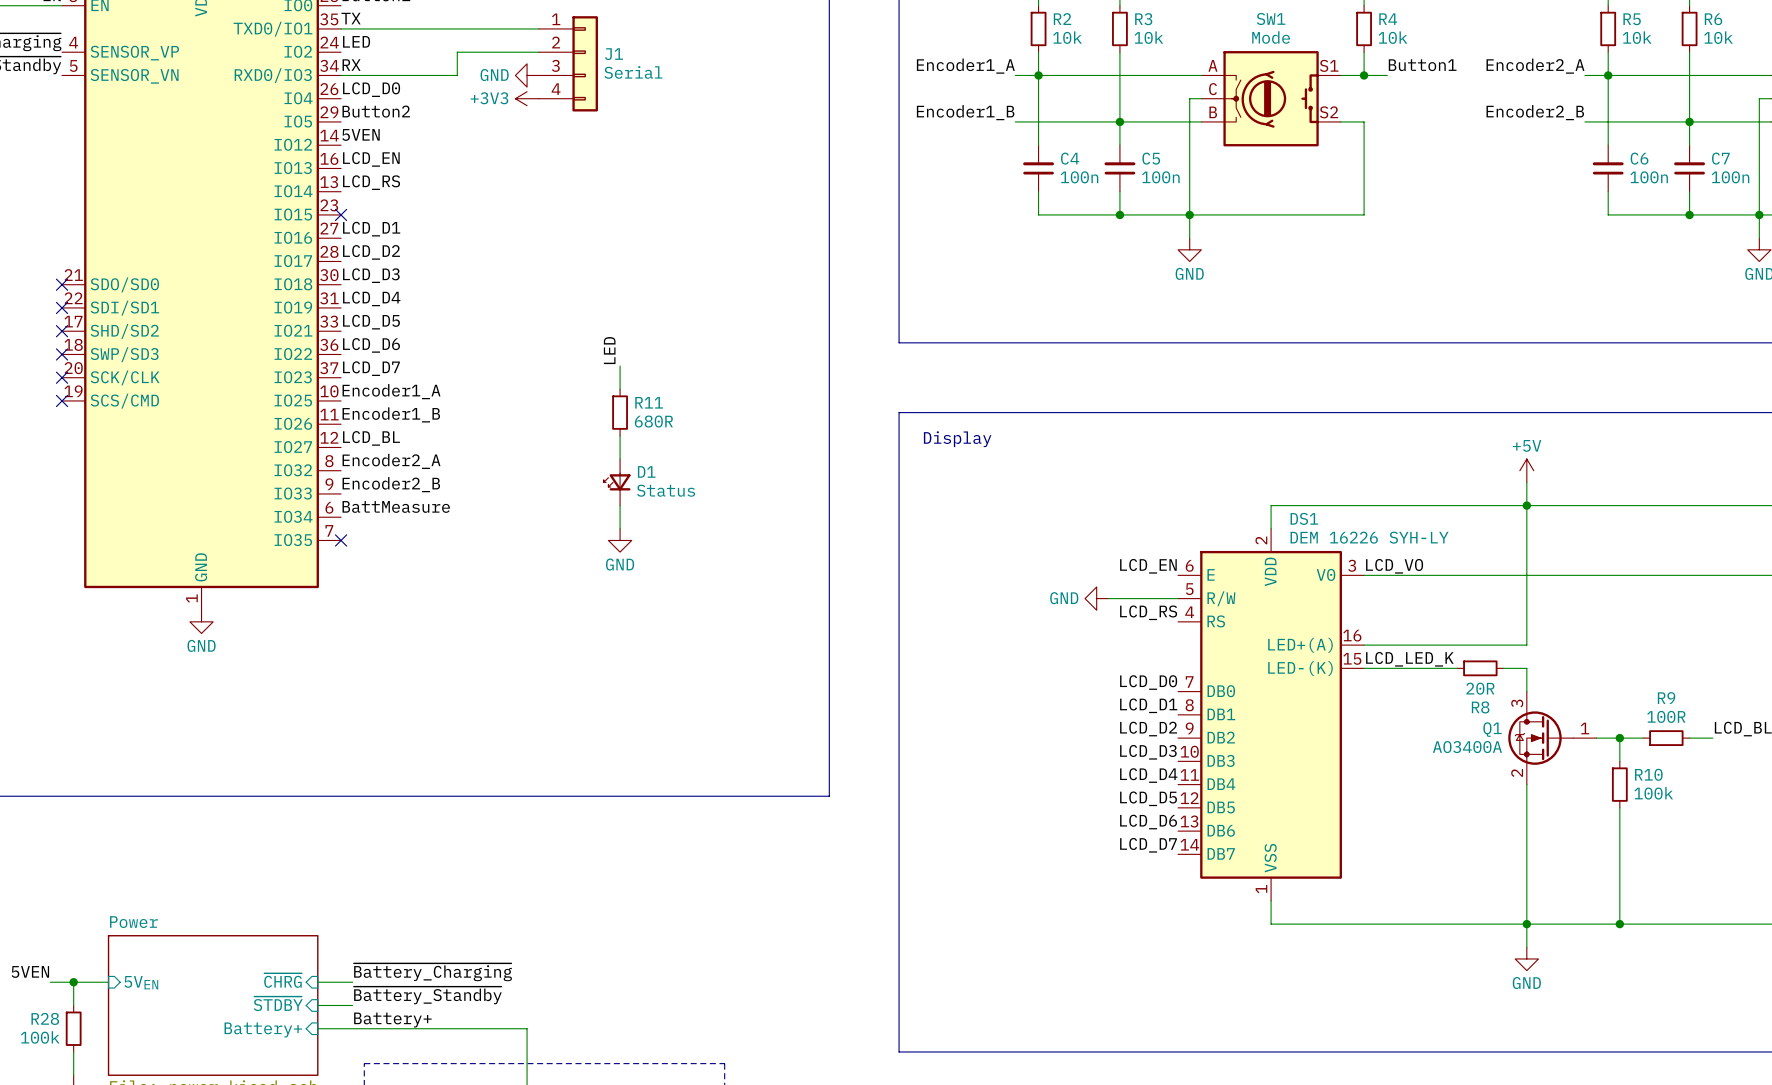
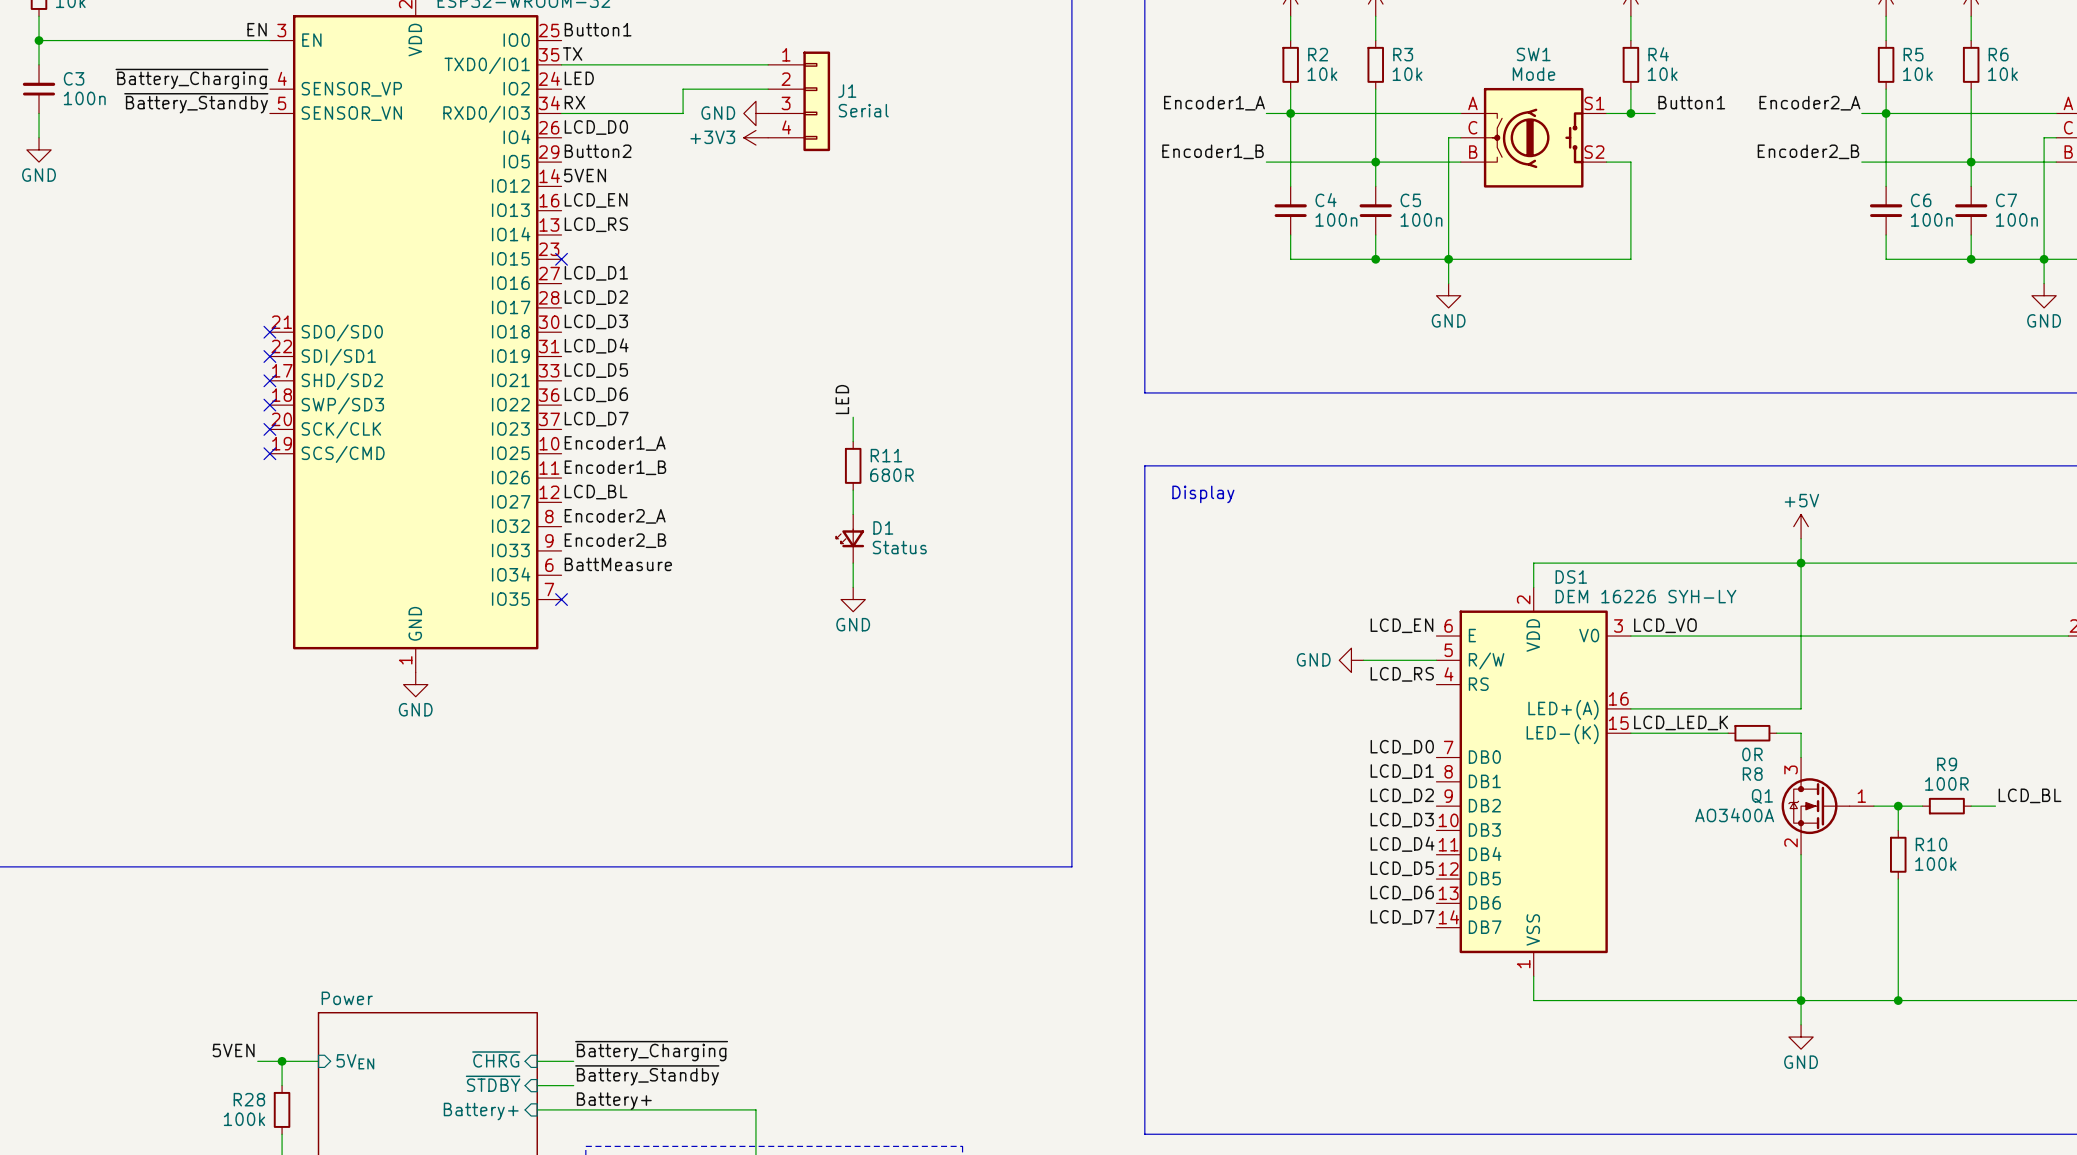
R8 value: 20R (1480, 688) -> 0R (1752, 754)

